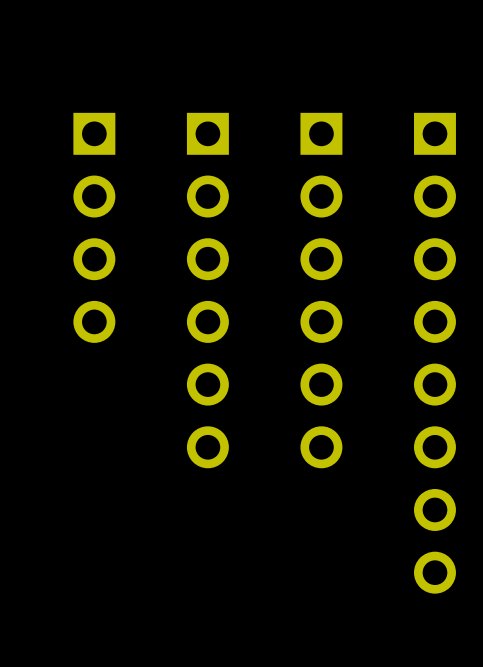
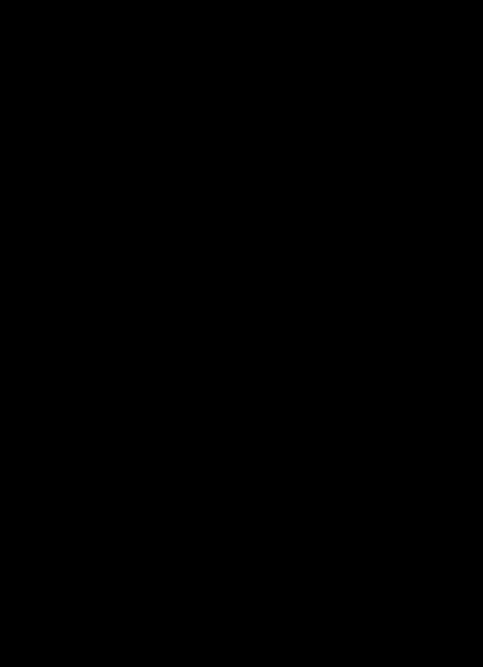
part: (94, 227) -> none
part: (207, 290) -> none
part: (321, 290) -> none
part: (434, 353) -> none

